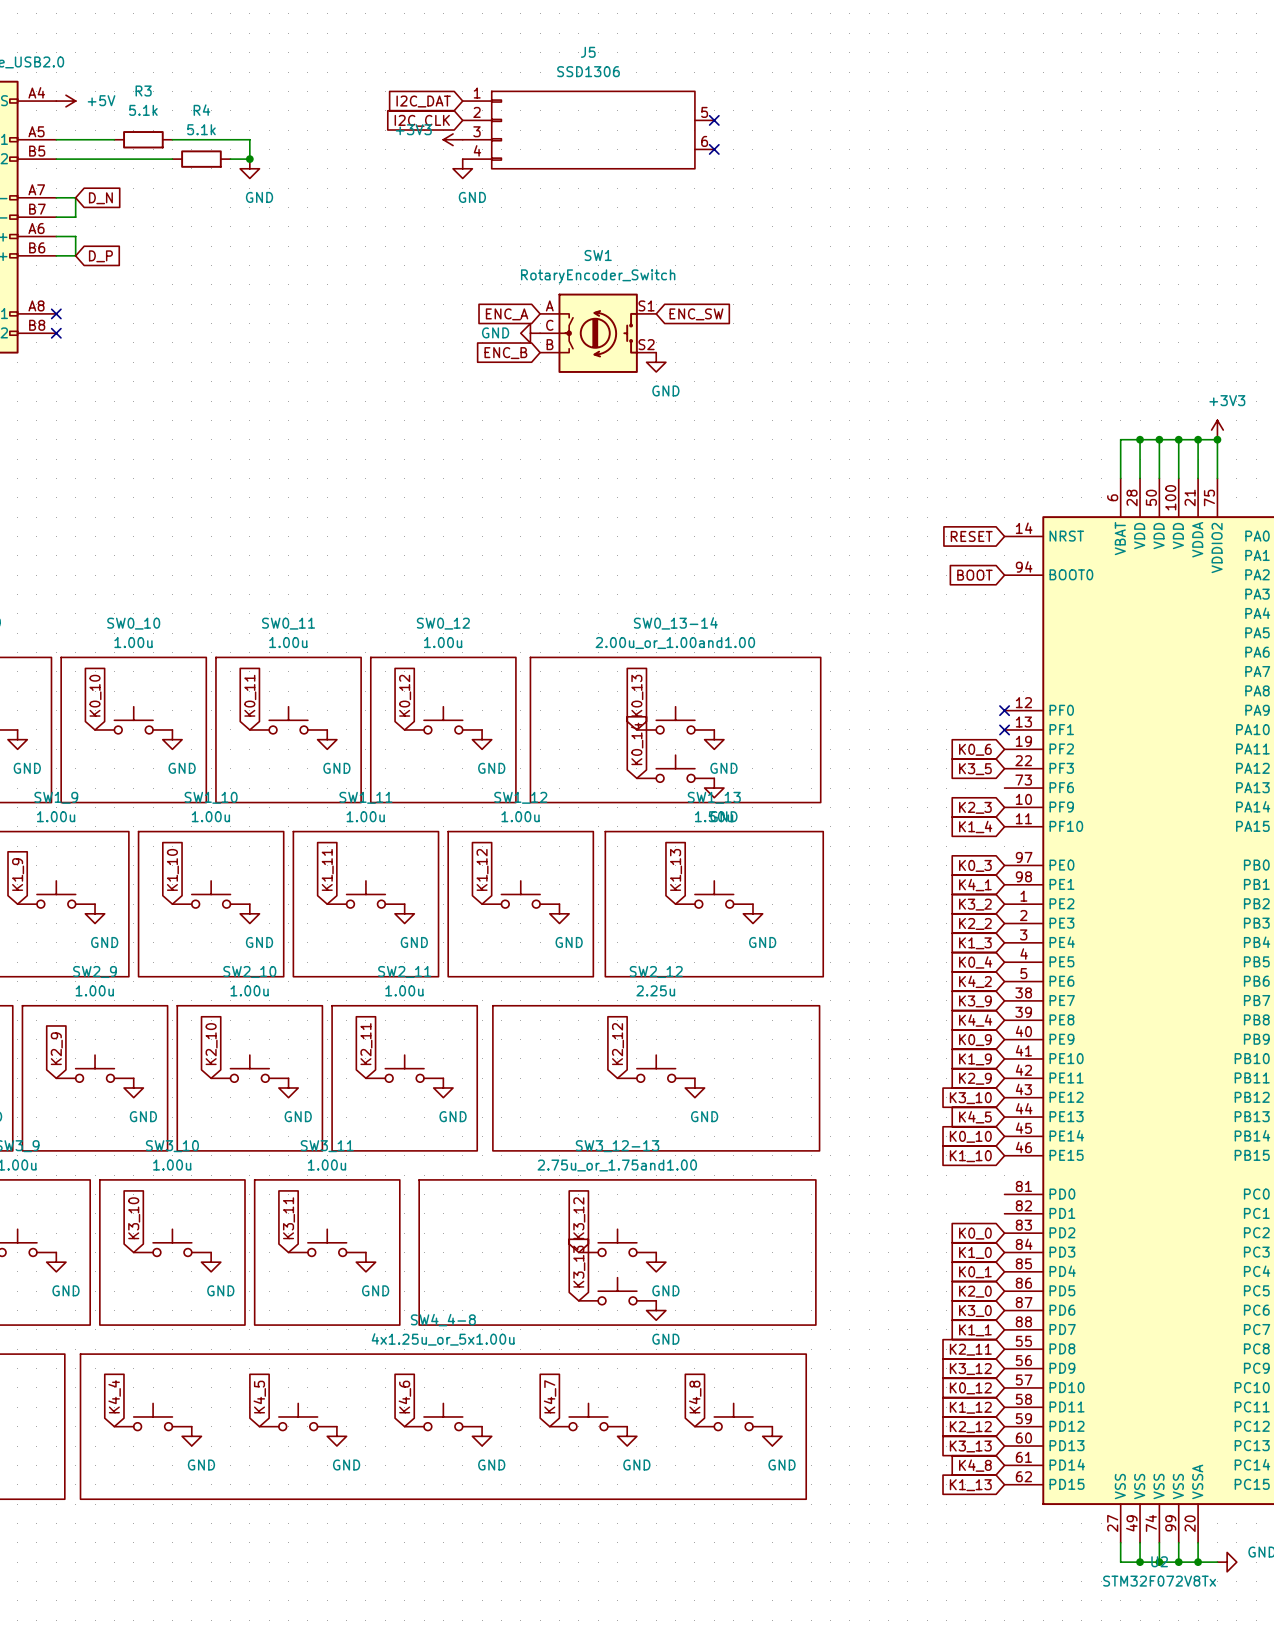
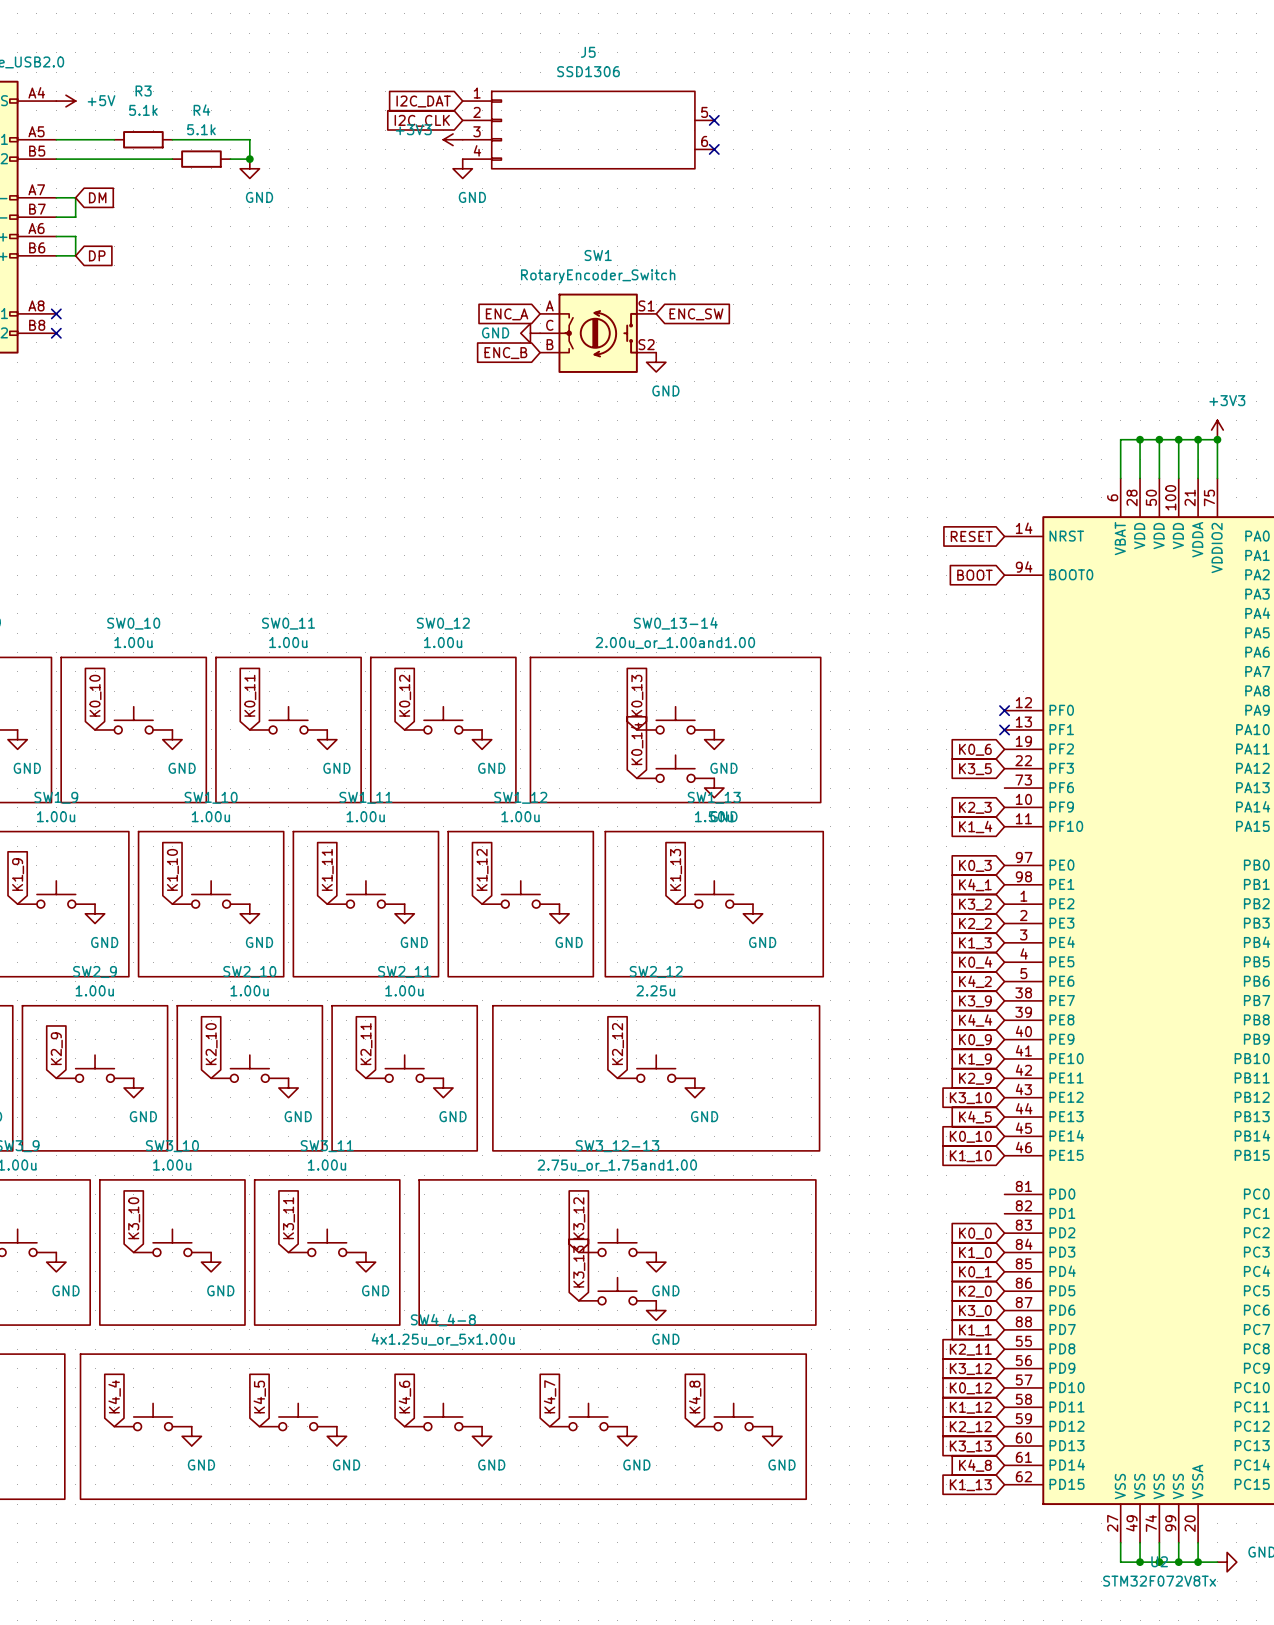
global label: D_N (100, 198) -> DM (97, 197)
global label: D_P (100, 256) -> DP (97, 255)

